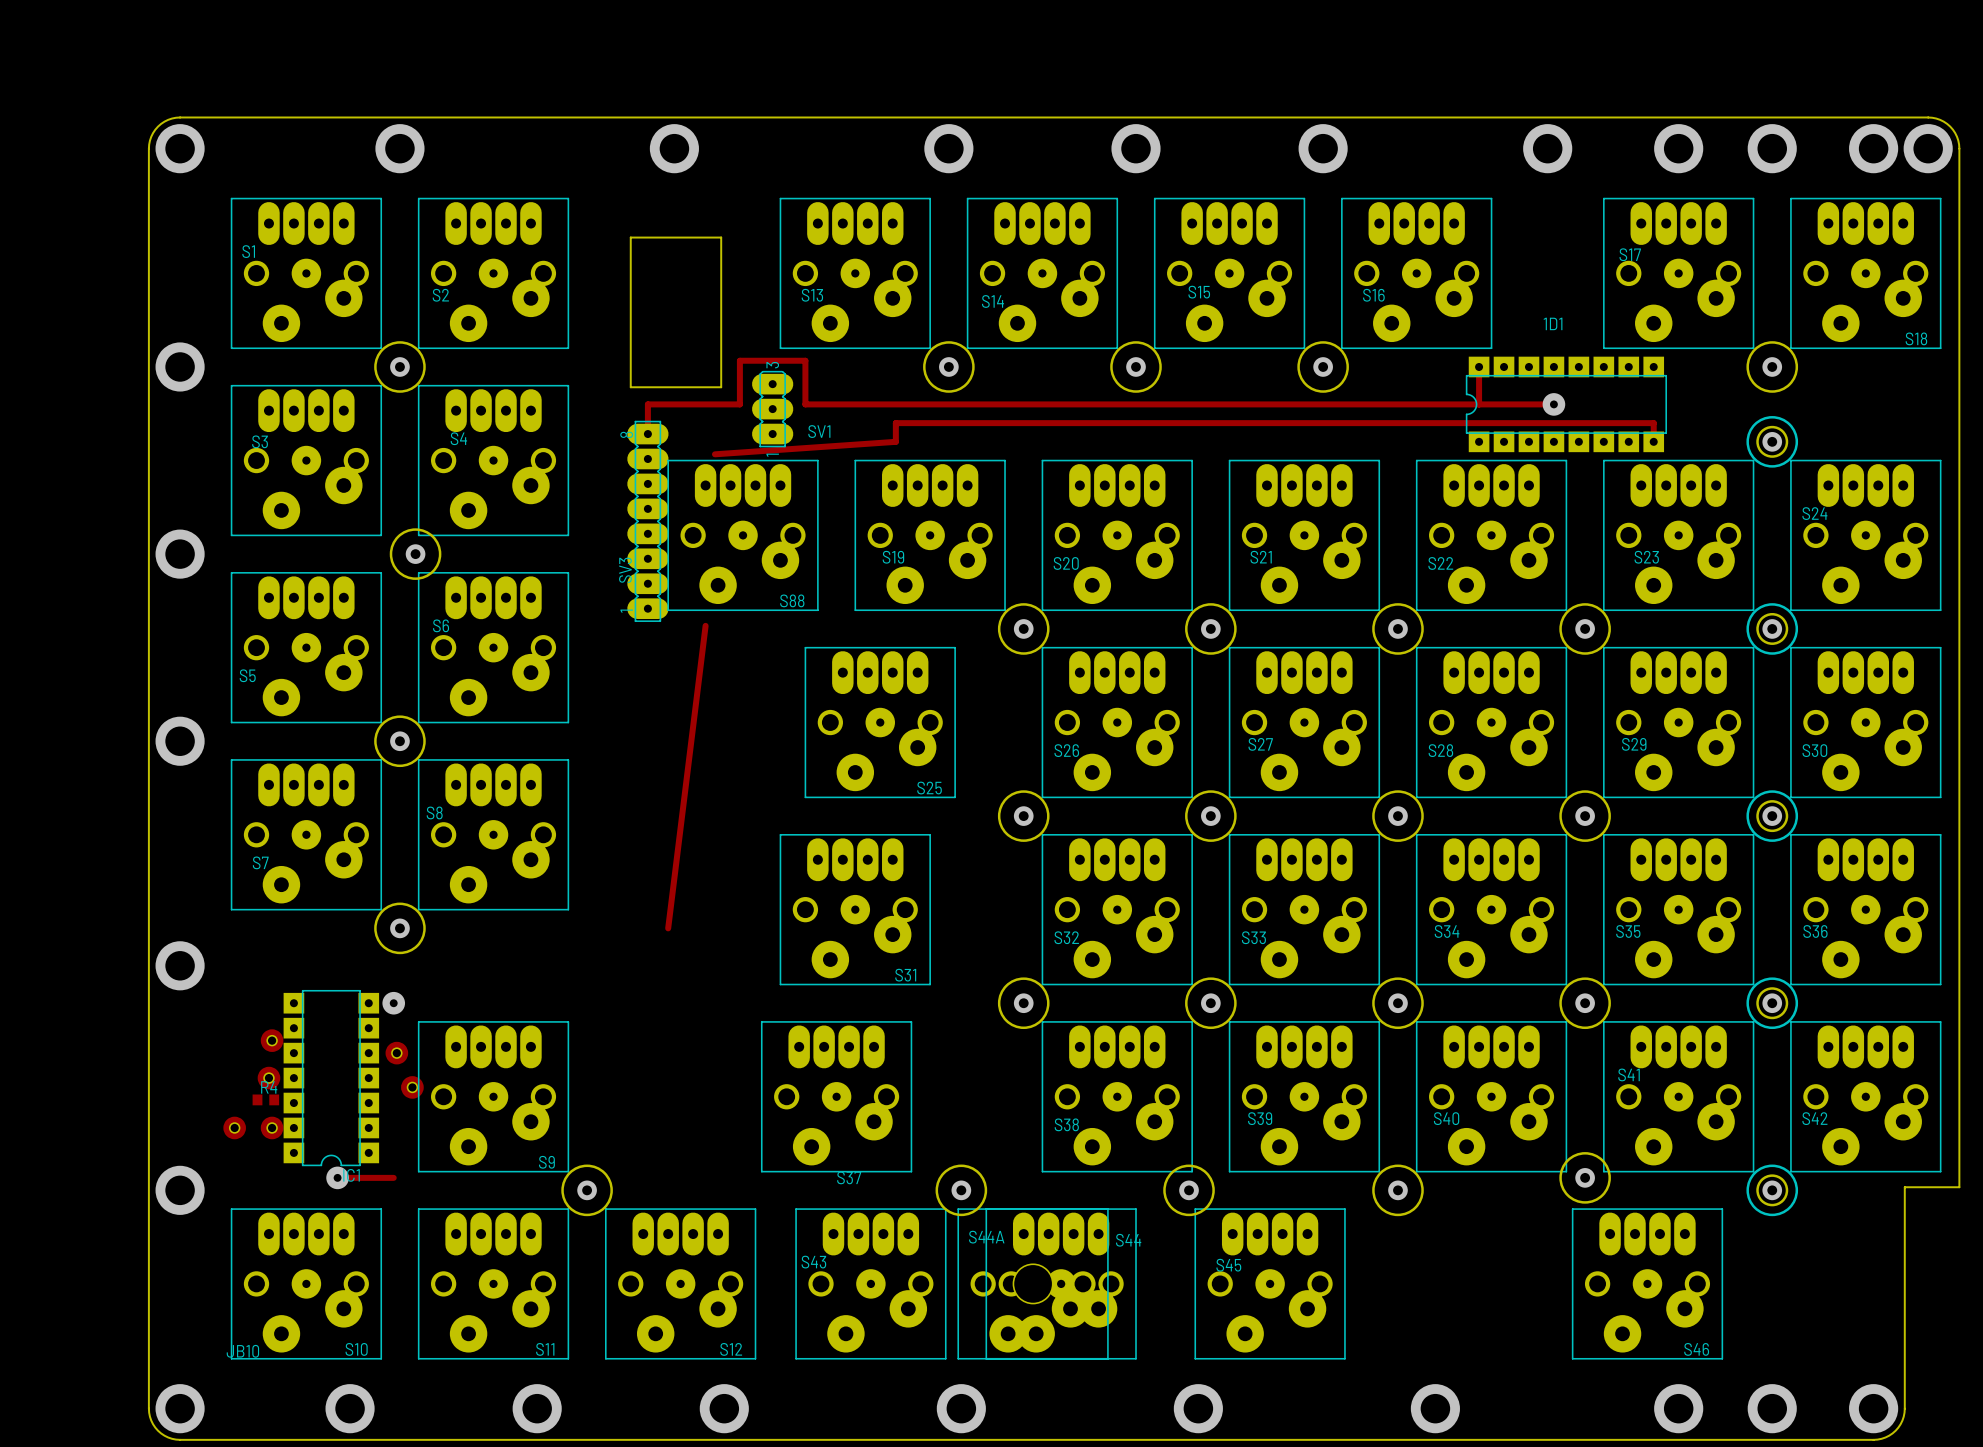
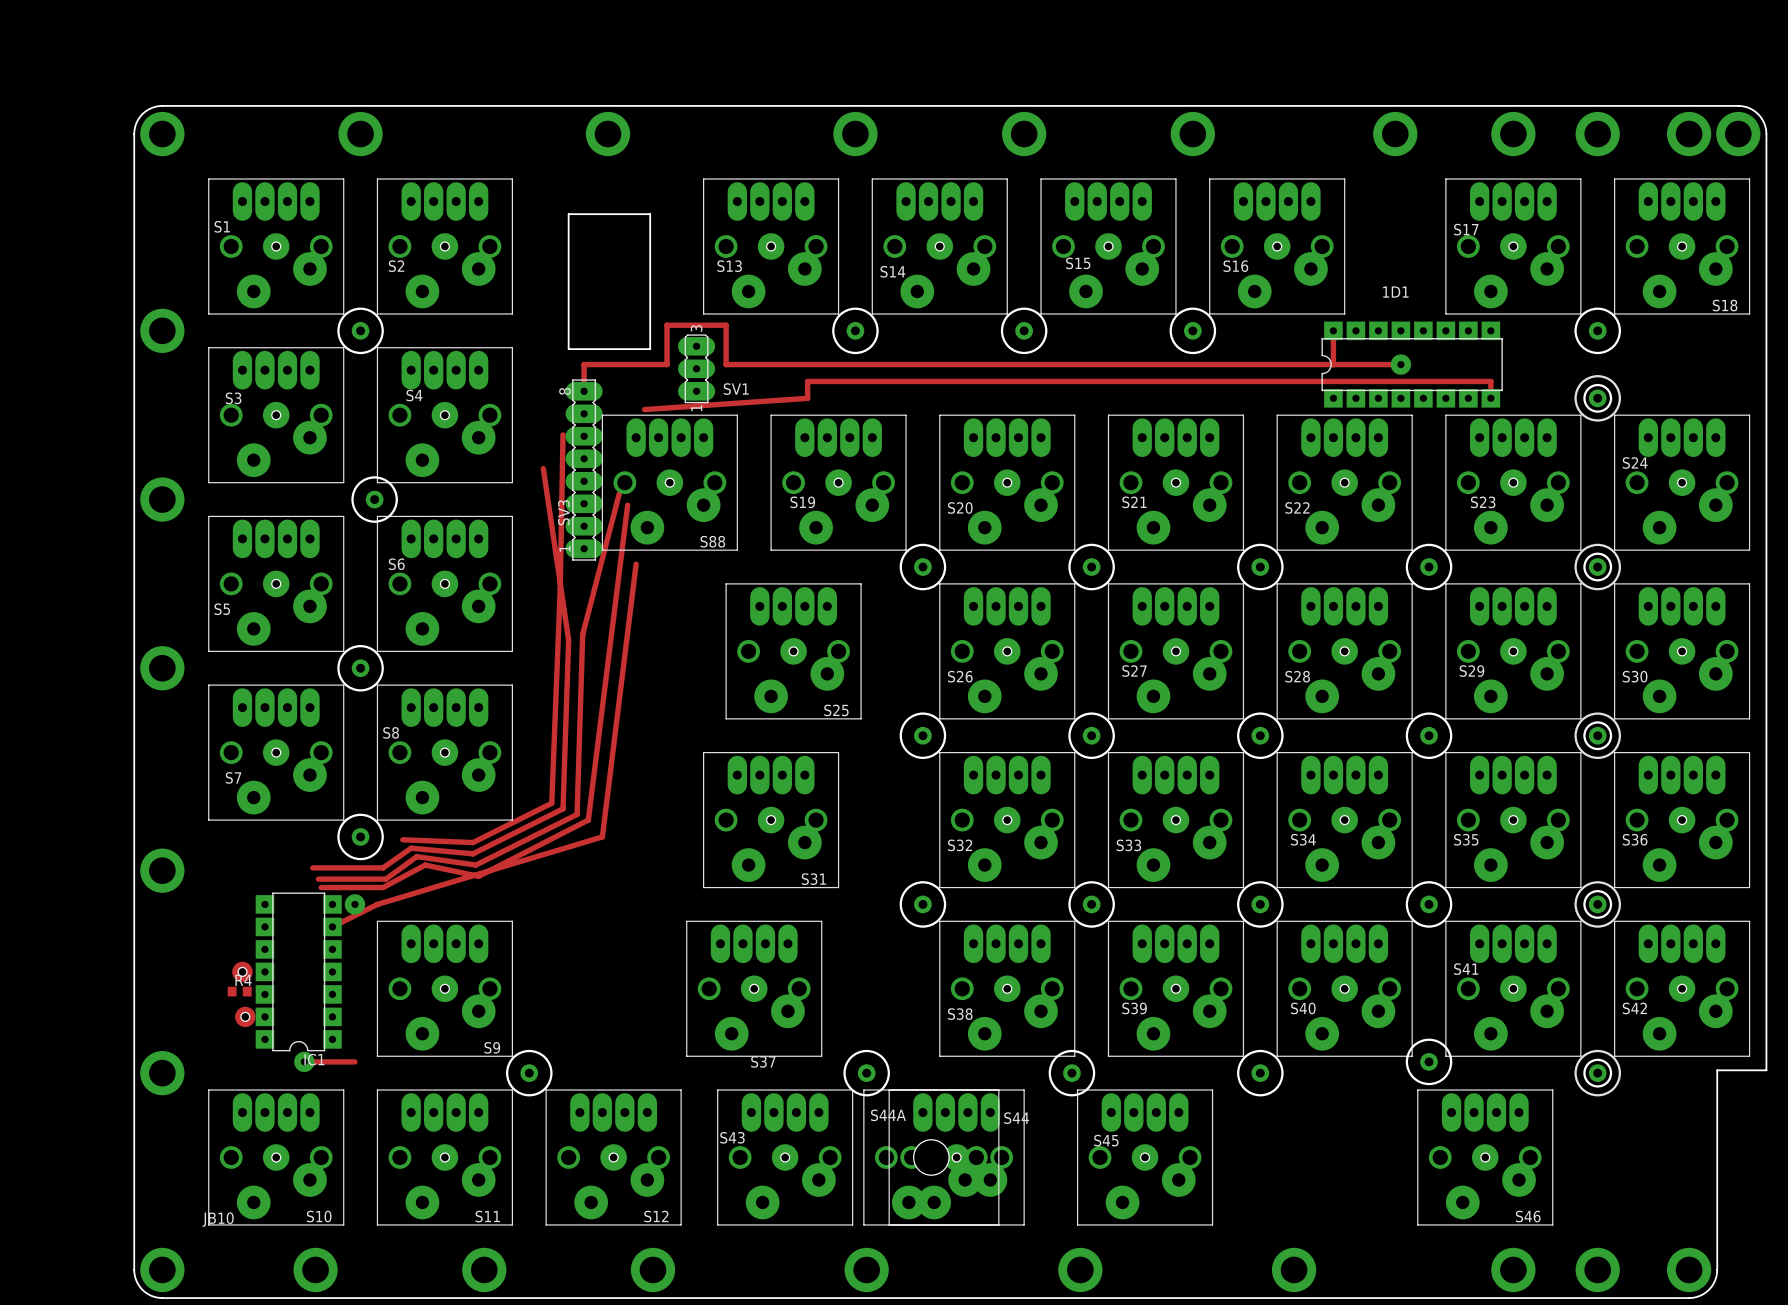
track: none -> (563, 434) (560, 589) (551, 803) (473, 842) (402, 839)
track: none -> (543, 468) (568, 640) (563, 808) (473, 853) (411, 848) (383, 867) (312, 867)
track: none -> (619, 493) (582, 634) (577, 814) (475, 865) (416, 856) (385, 879) (318, 879)
track: none -> (627, 505) (588, 820) (478, 876) (425, 865) (383, 887) (321, 887)
track: none -> (602, 836) (377, 904) (332, 926)
part: (272, 1040) -> none
part: (396, 1053) -> none
part: (412, 1087) -> none
part: (234, 1127) -> none

